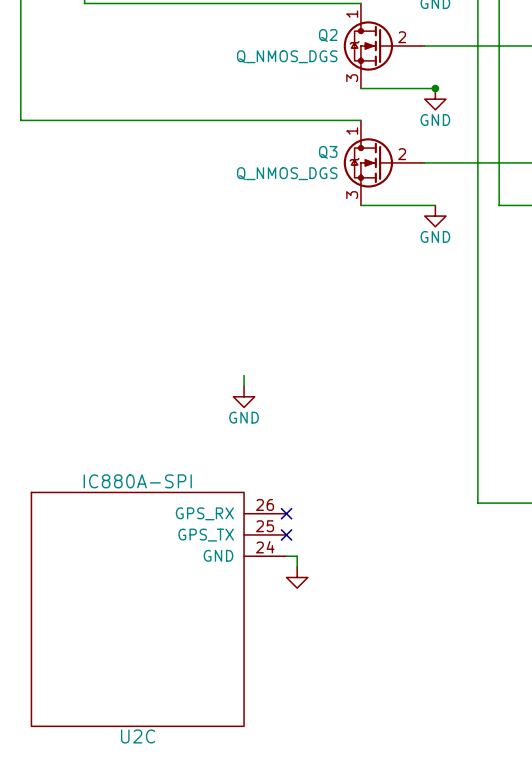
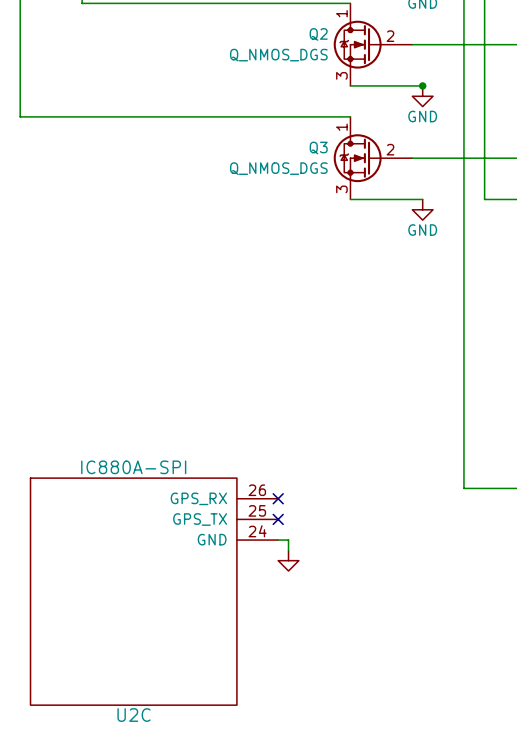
wire: (244, 375) (244, 386) -> none
power symbol: GND (244, 396) -> none

